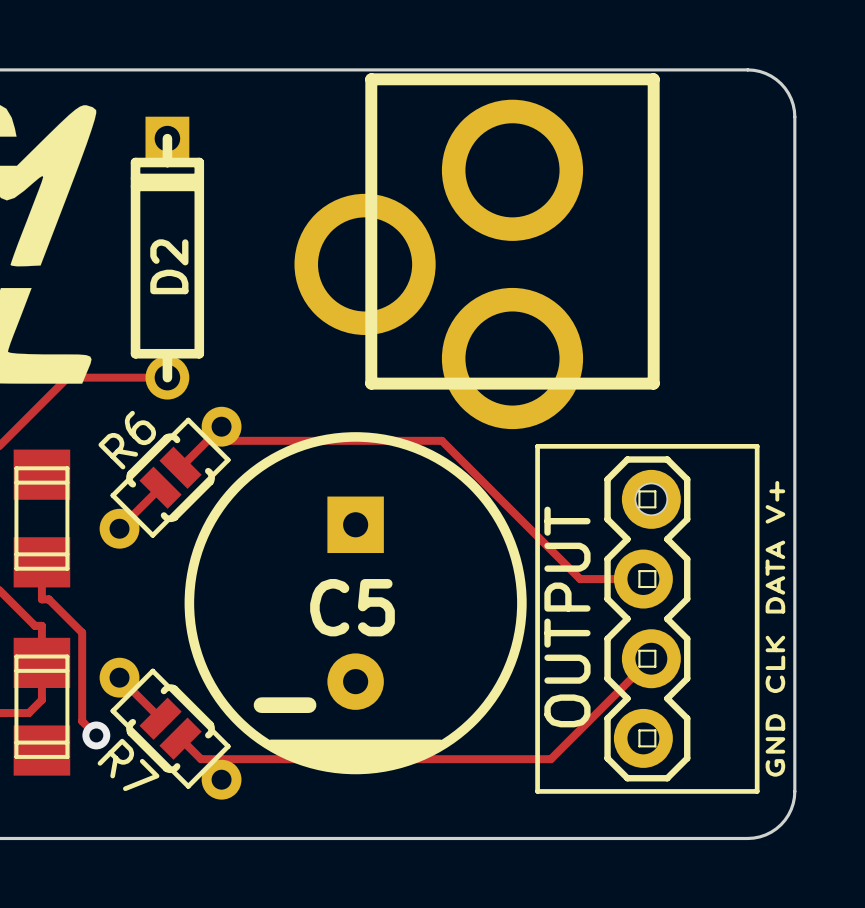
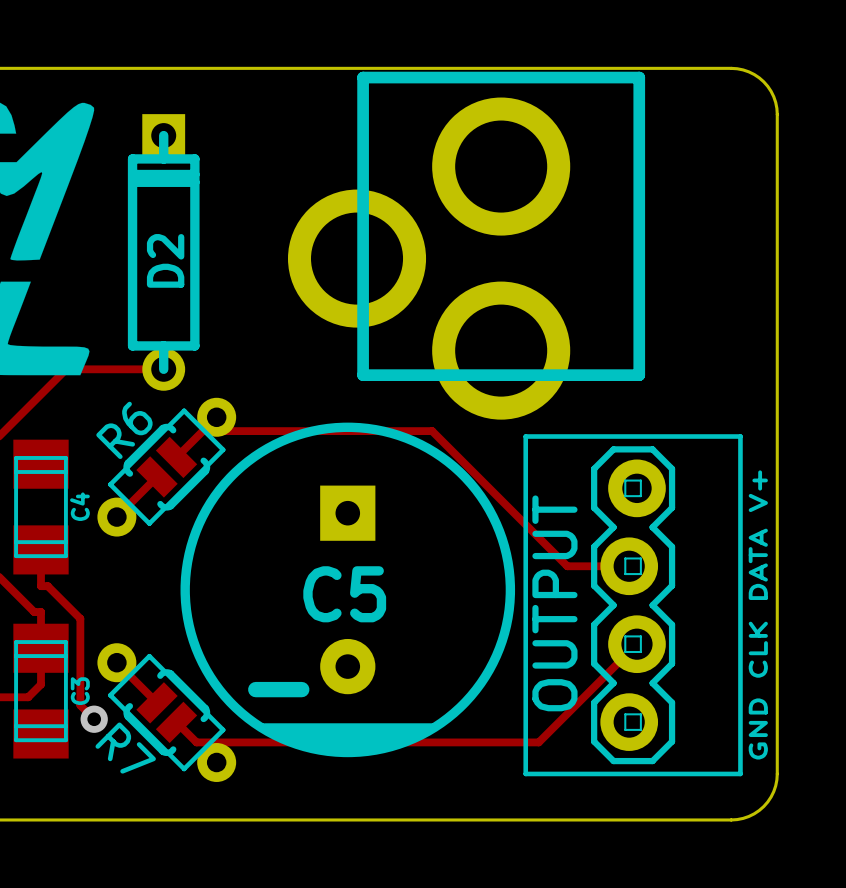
C4 name: none -> C4 (79, 506)
C3 name: none -> C3 (80, 691)

